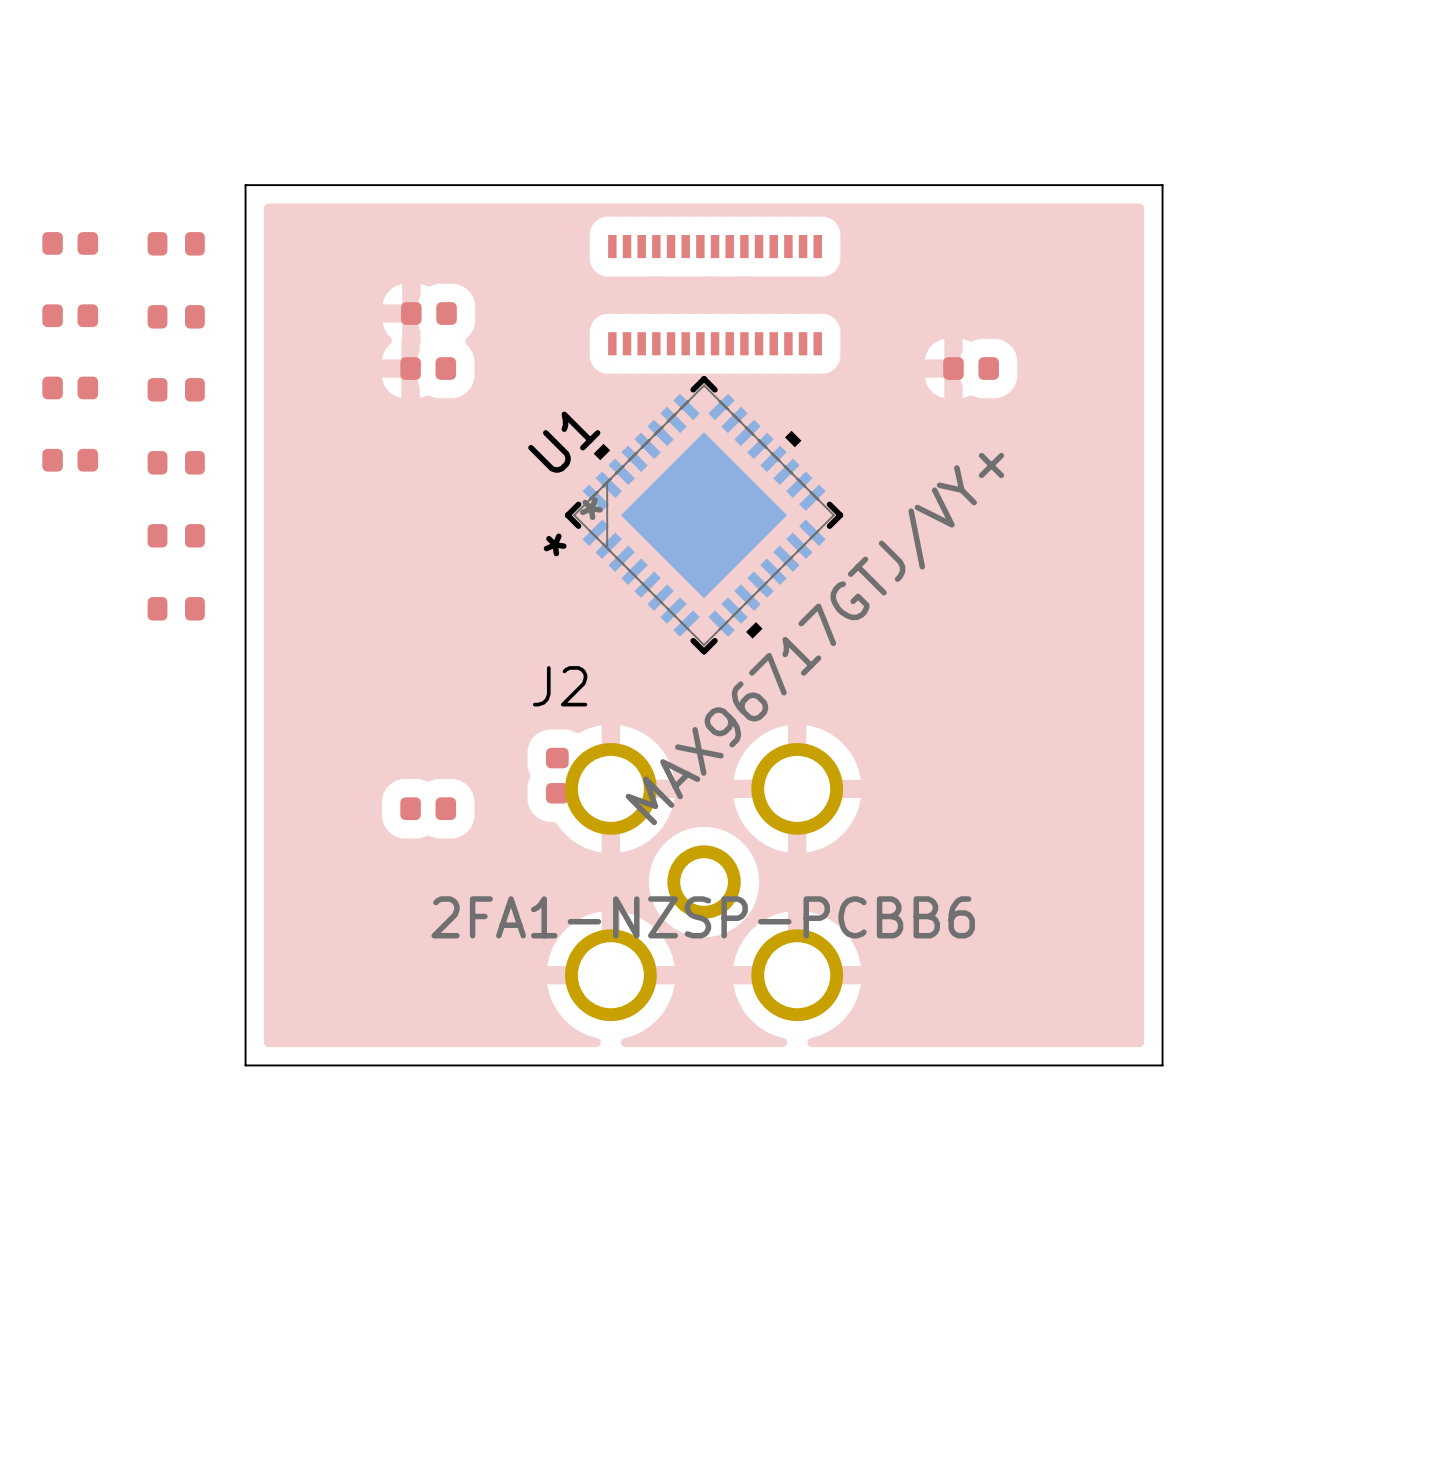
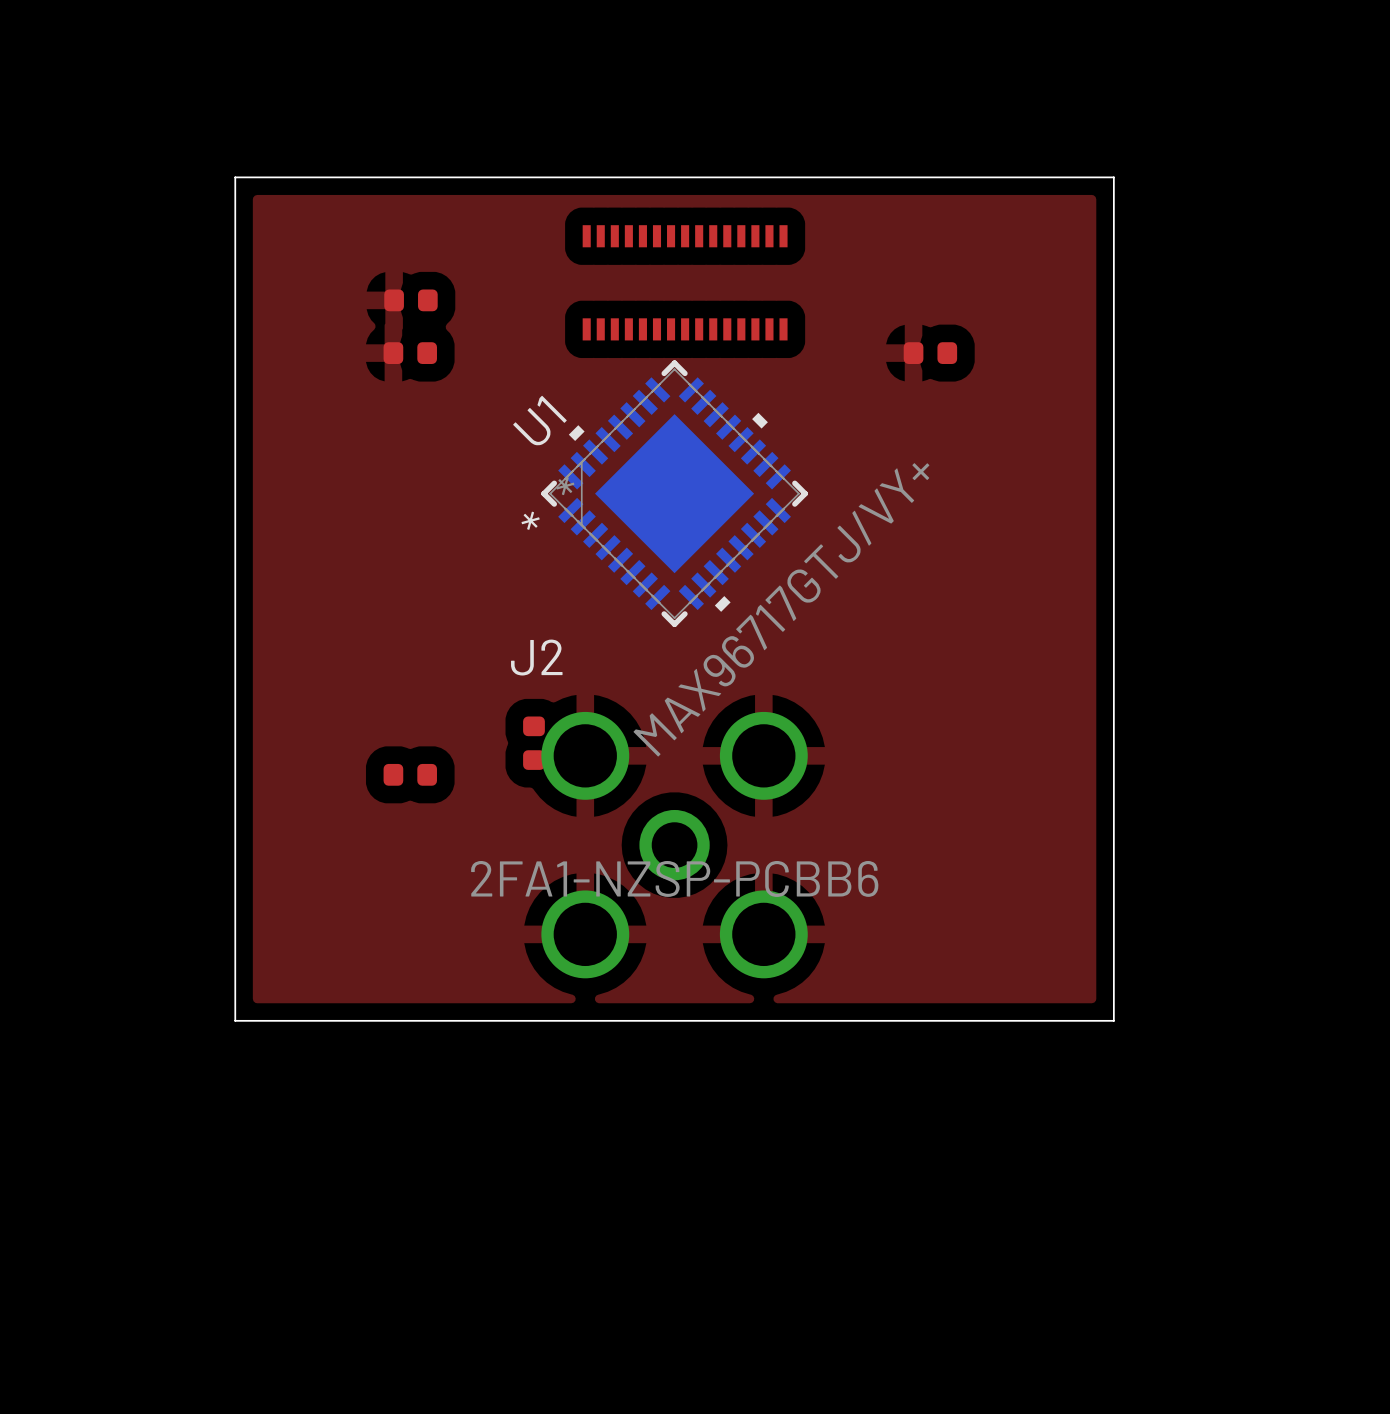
part: (70, 243) -> none
part: (176, 243) -> none
part: (70, 315) -> none
part: (176, 316) -> none
part: (70, 387) -> none
part: (176, 389) -> none
part: (70, 460) -> none
part: (176, 462) -> none
part: (176, 535) -> none
part: (176, 608) -> none

